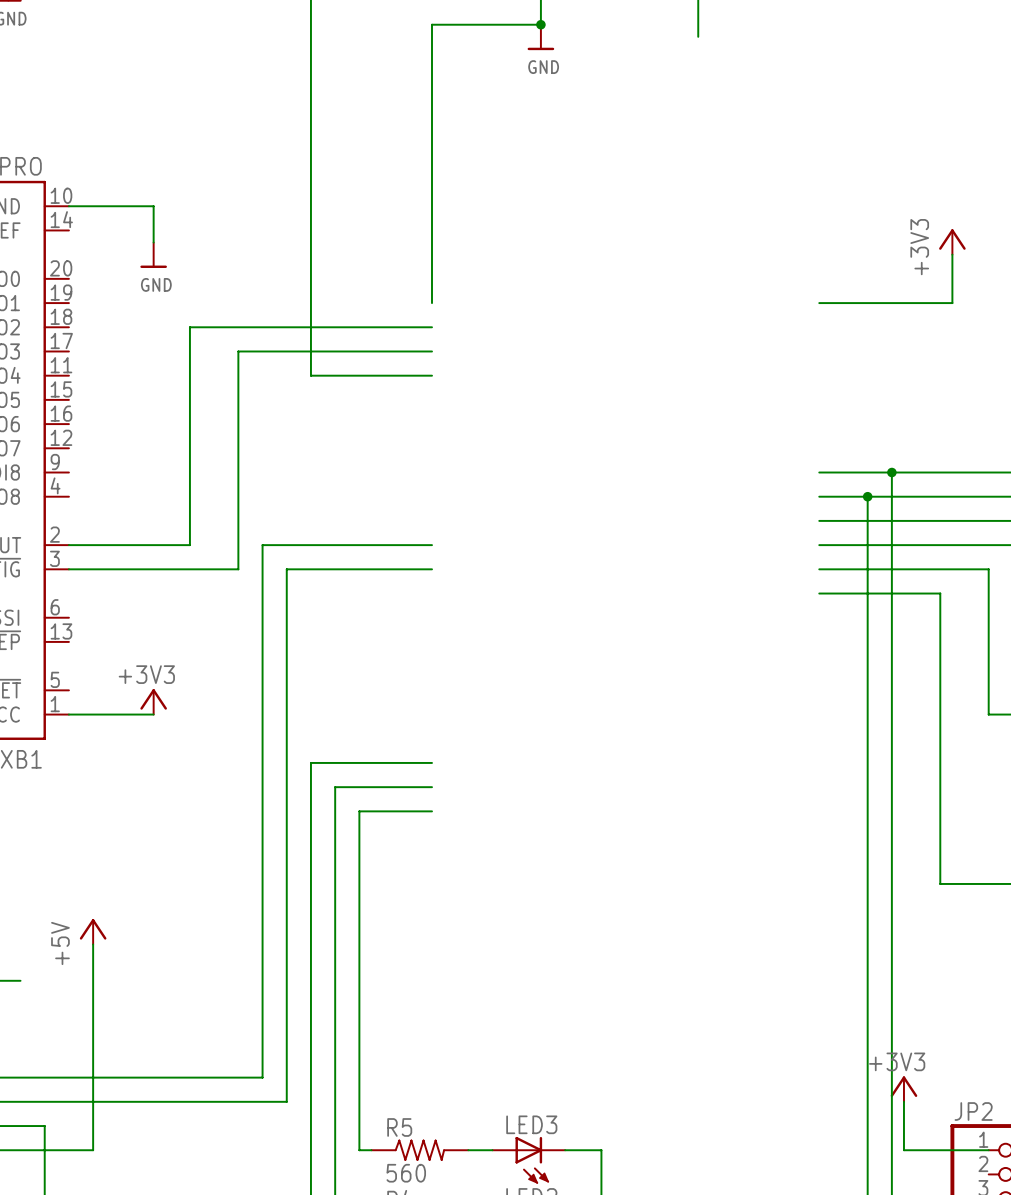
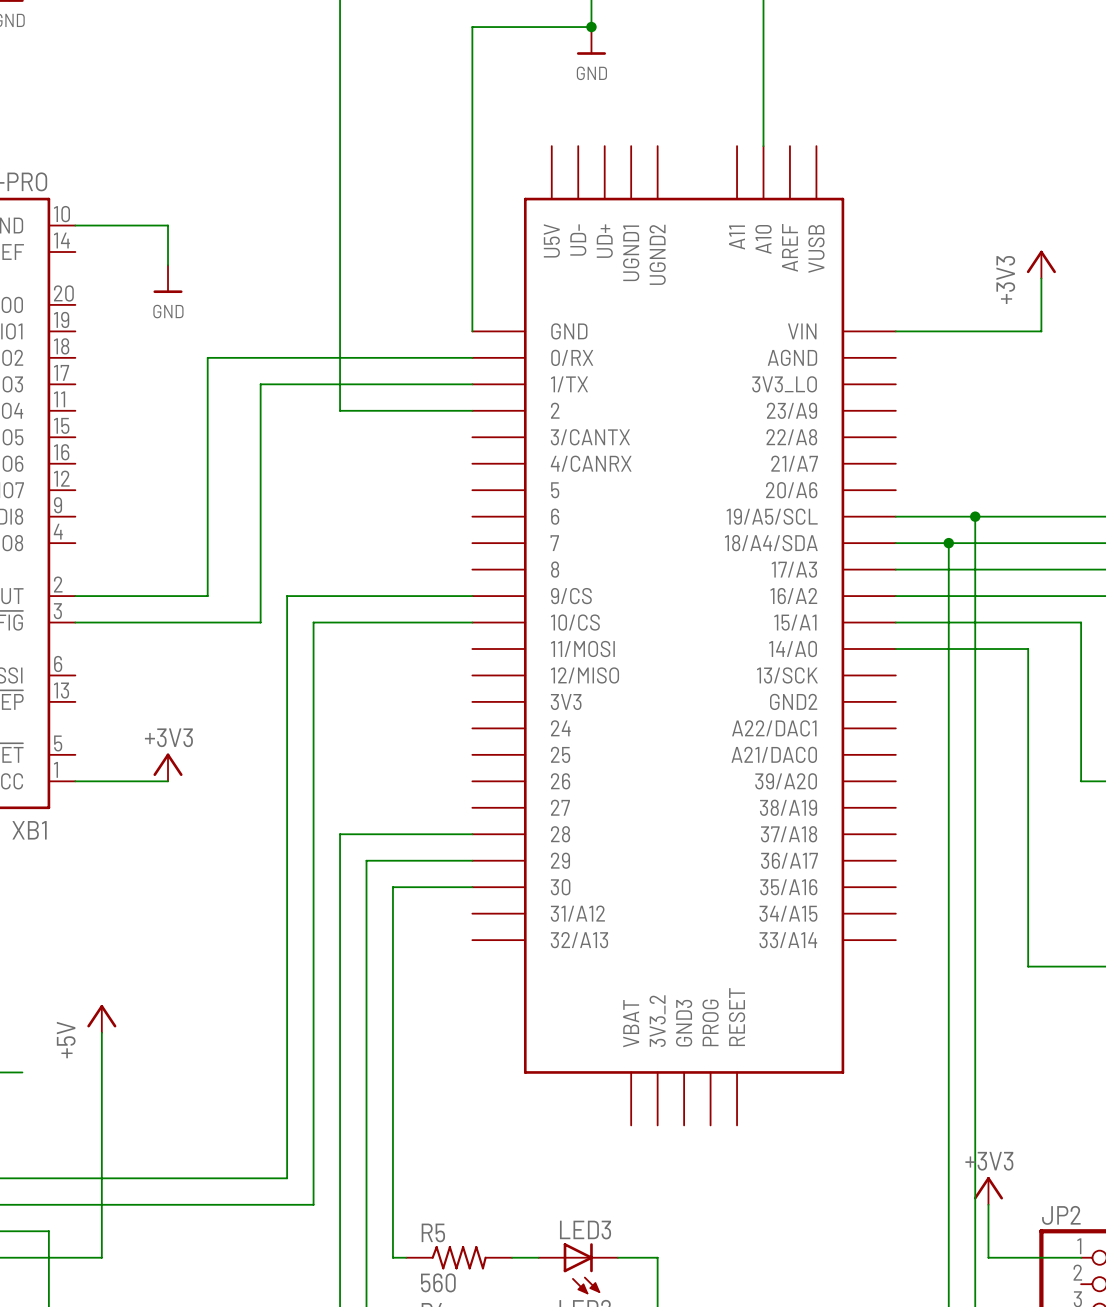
wire: none -> (763, 40) (763, 146)
part: none -> (684, 635)

